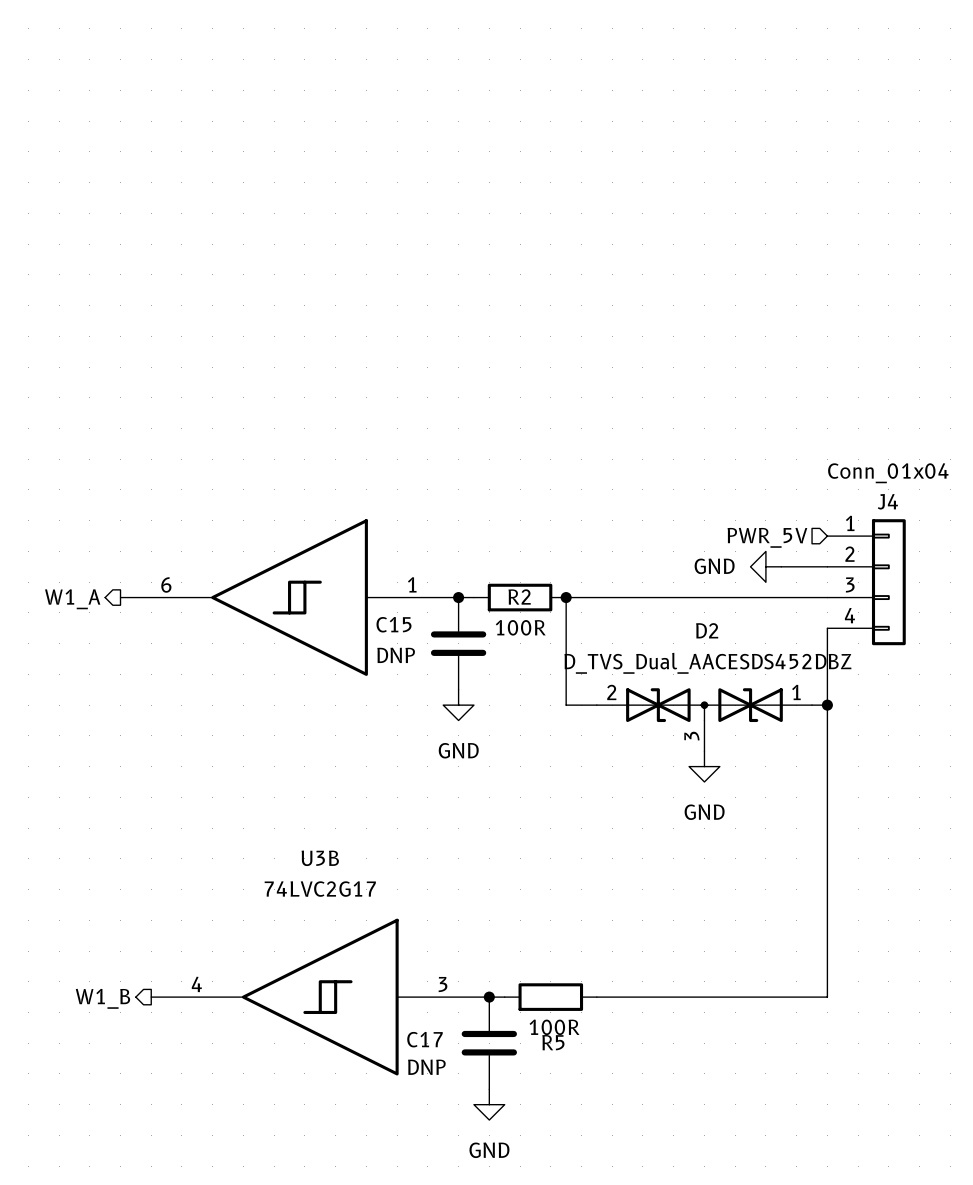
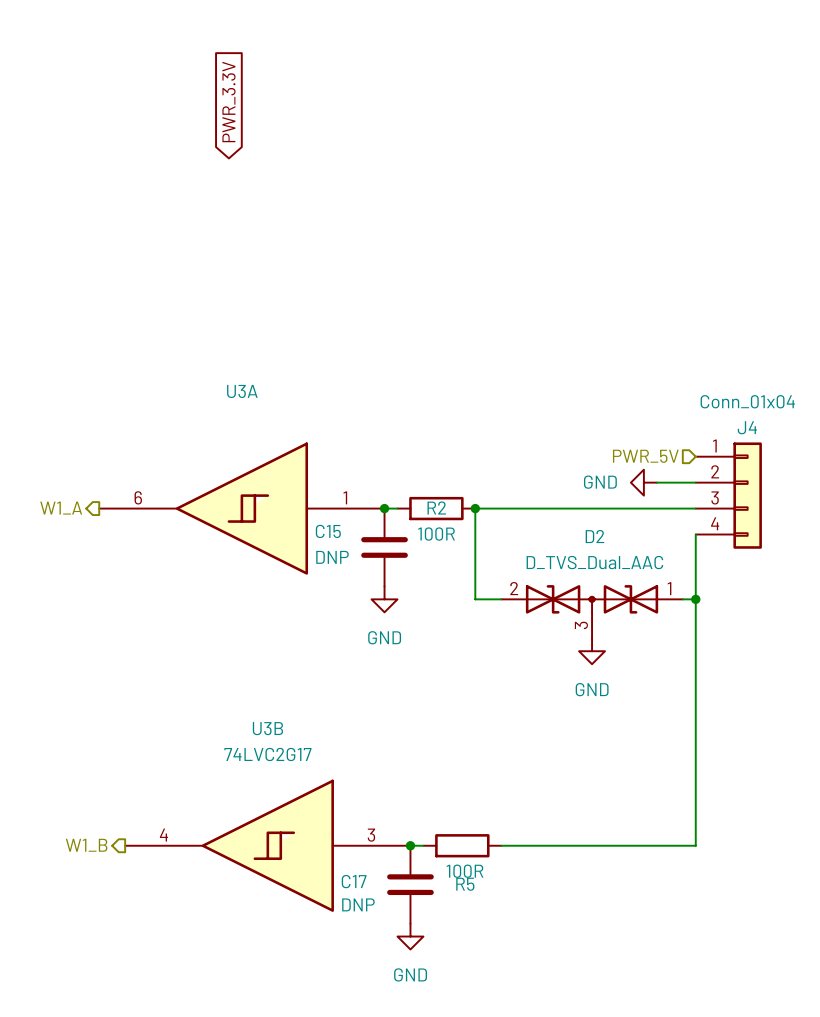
global label: none -> PWR_3.3V (228, 102)
U3A name: none -> U3A (242, 391)
D2 value: D_TVS_Dual_AACESDS452DBZ (707, 663) -> D_TVS_Dual_AAC (594, 562)

